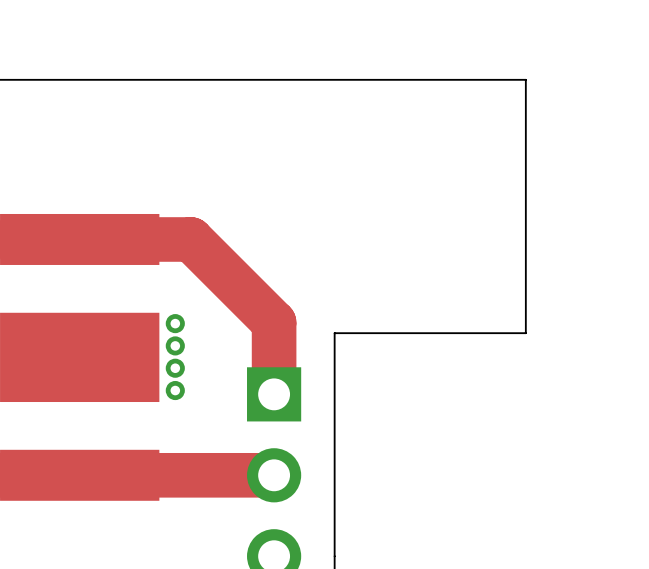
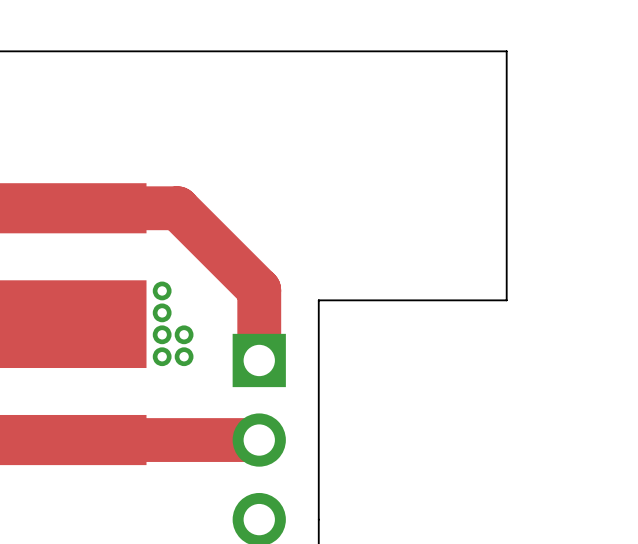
via: none -> (184, 334)
via: none -> (184, 356)

